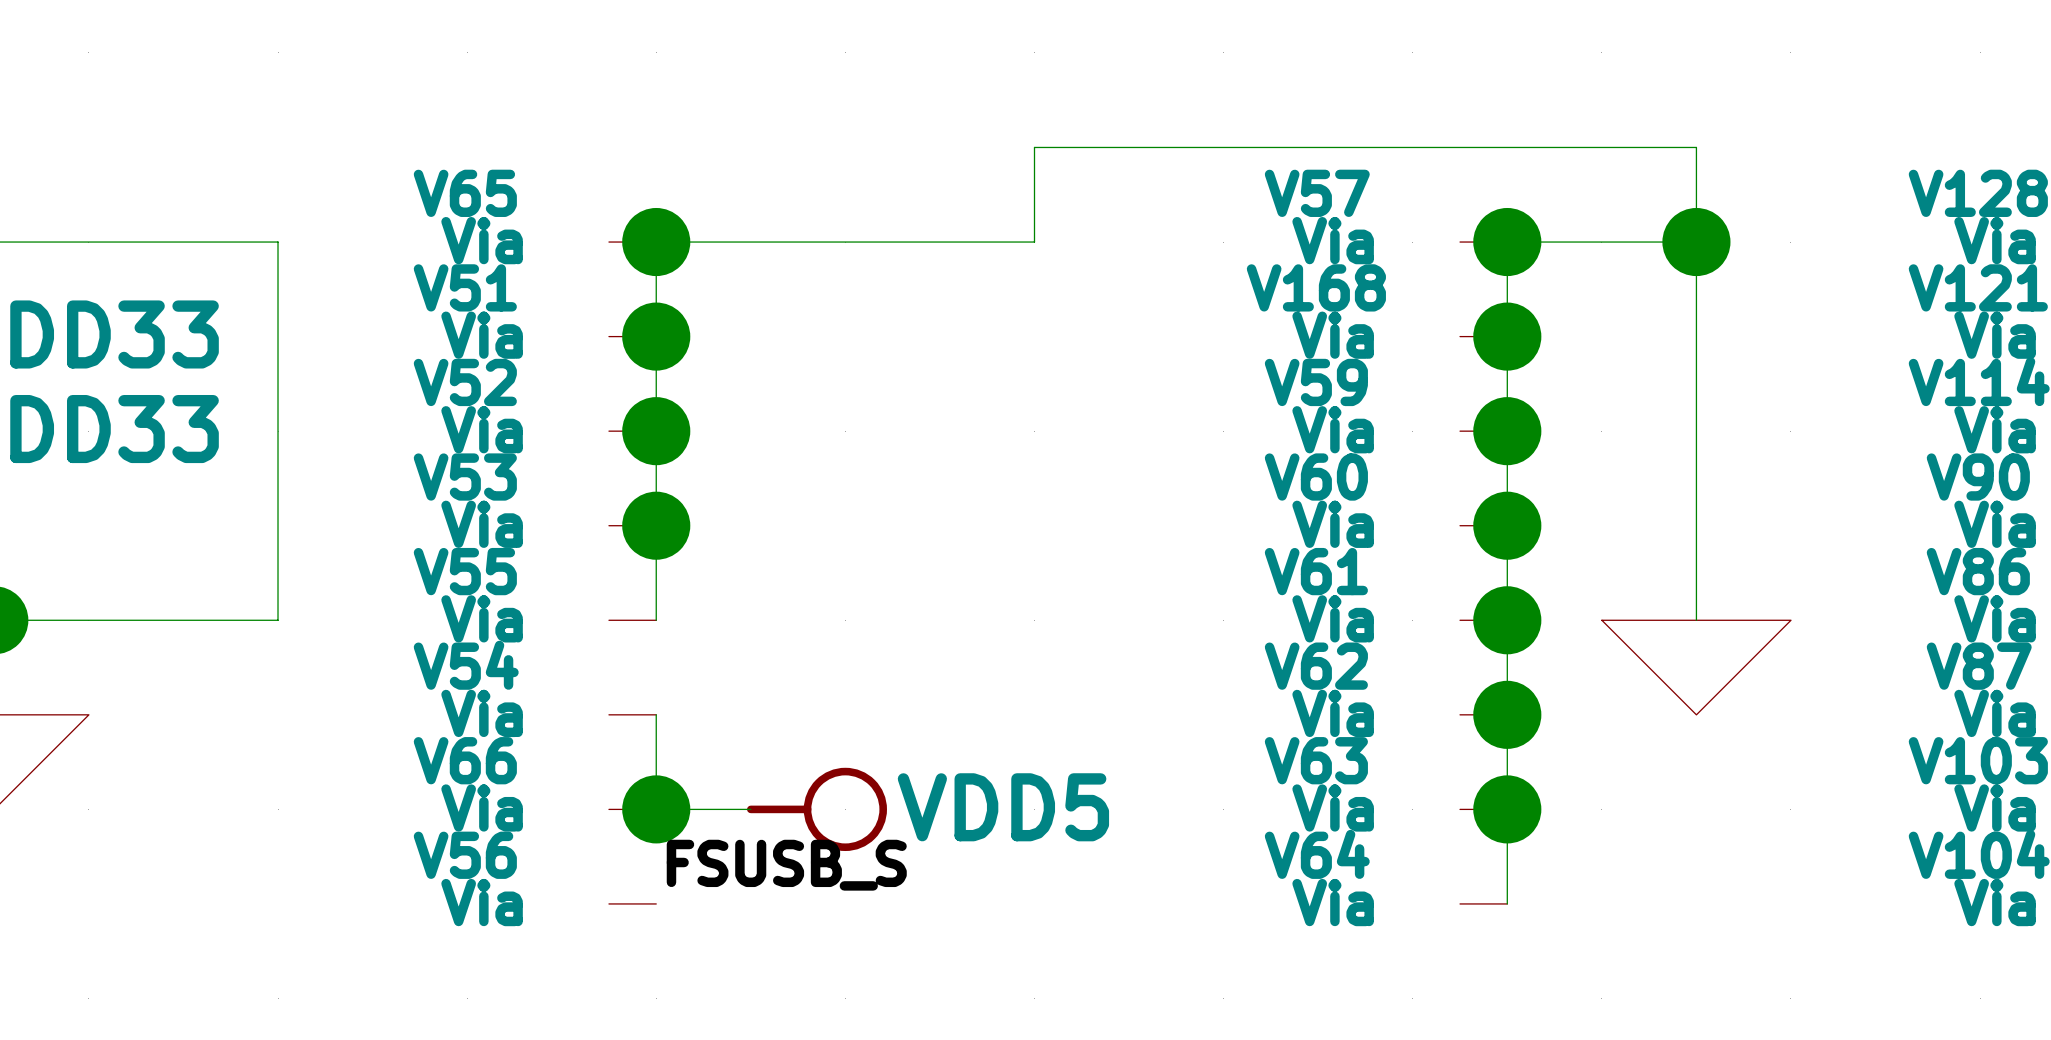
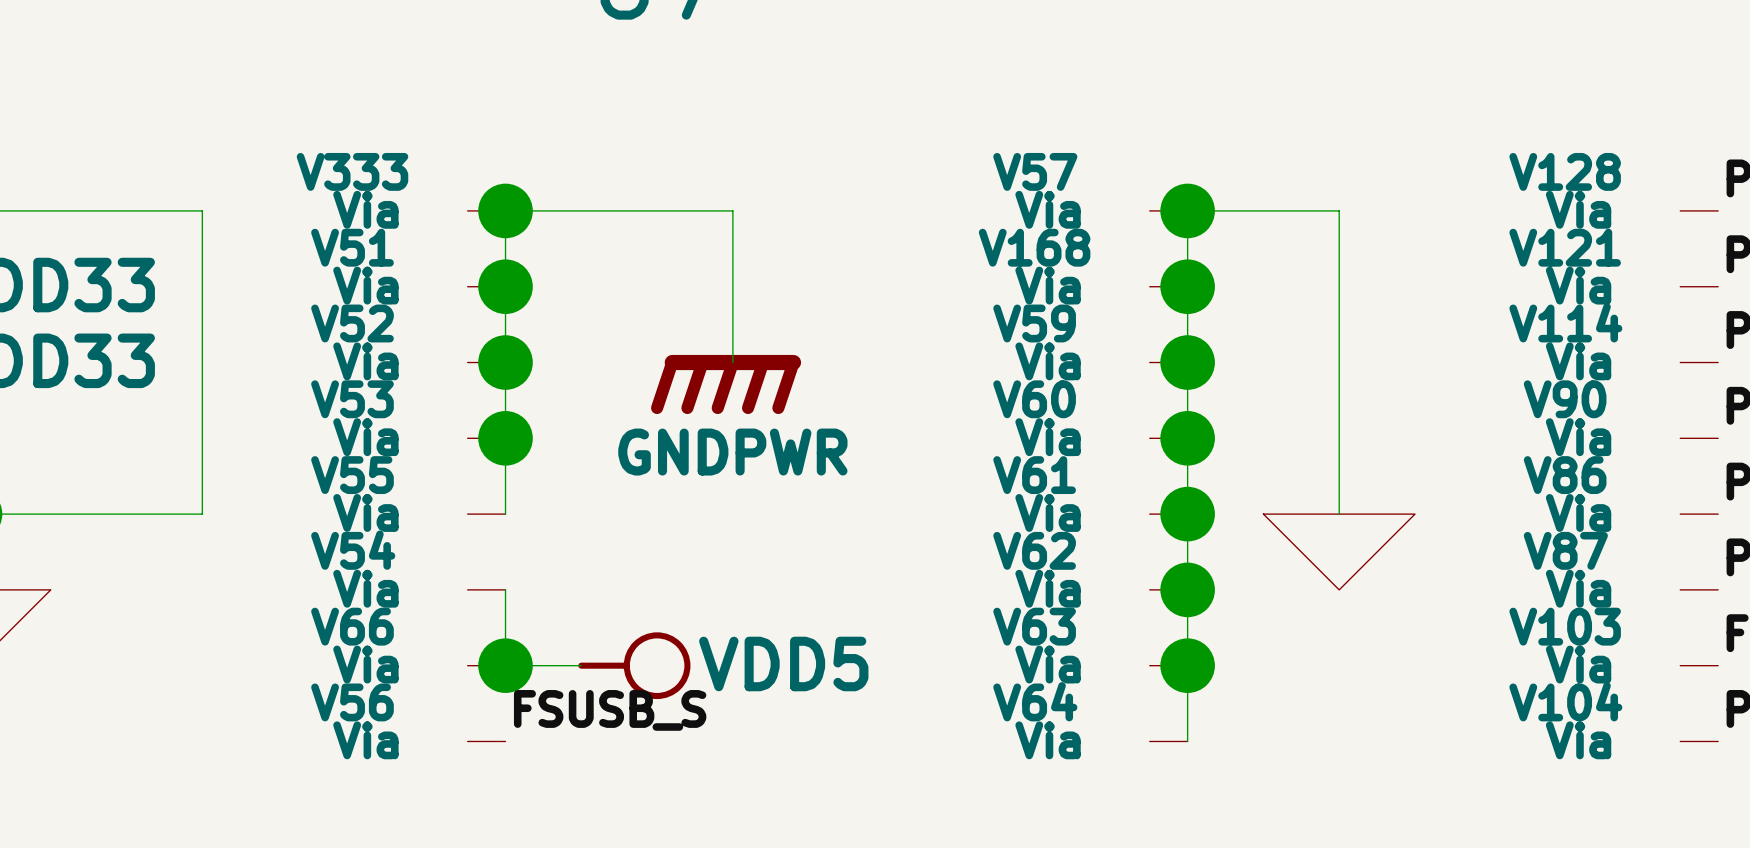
V65 name: V65 (465, 193) -> V333 (352, 171)
wire: (939, 242) (1034, 242) (1034, 147) (1696, 147) (1696, 242) -> (732, 210) (732, 362)
junction: (1696, 242) -> none
power symbol: none -> GNDPWR (726, 384)

